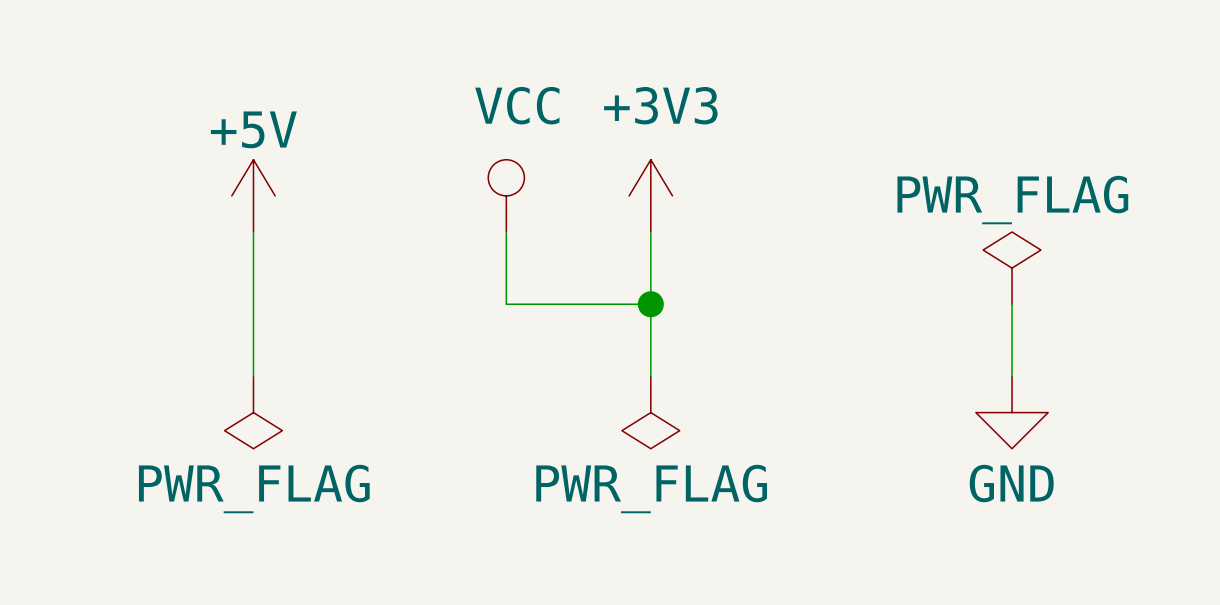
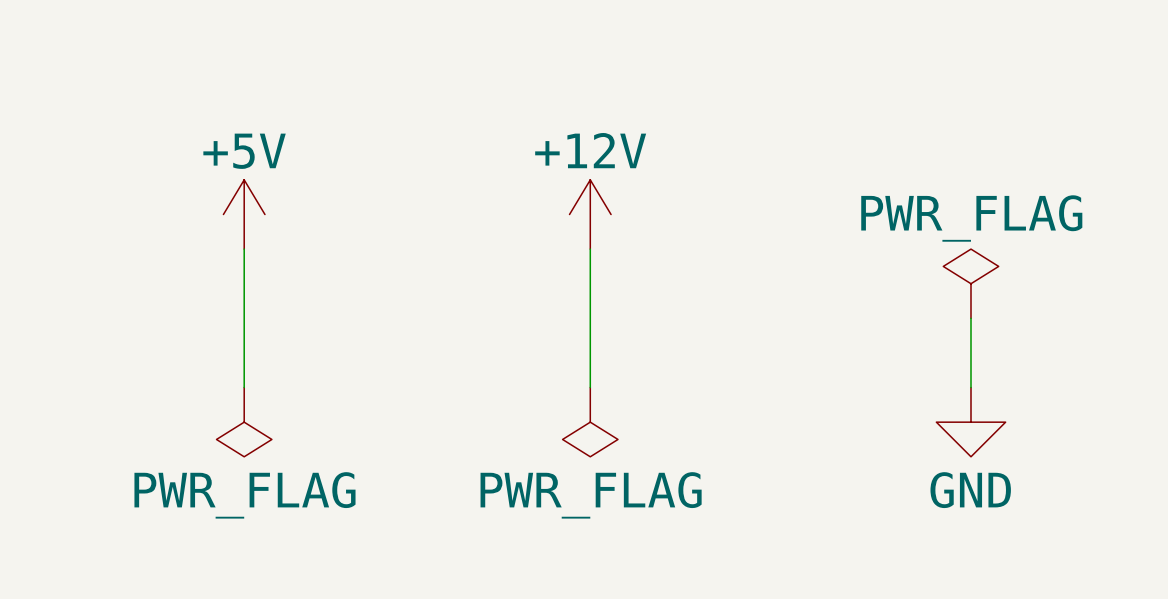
power symbol: VCC (506, 195) -> none
power symbol: none -> +12V (590, 214)
power symbol: +3V3 (650, 195) -> none
wire: (506, 231) (506, 304) (650, 304) -> none
wire: (650, 231) (650, 376) -> (590, 249) (590, 387)
junction: (650, 304) -> none
power symbol position: PWR_FLAG (650, 412) -> PWR_FLAG (590, 422)

